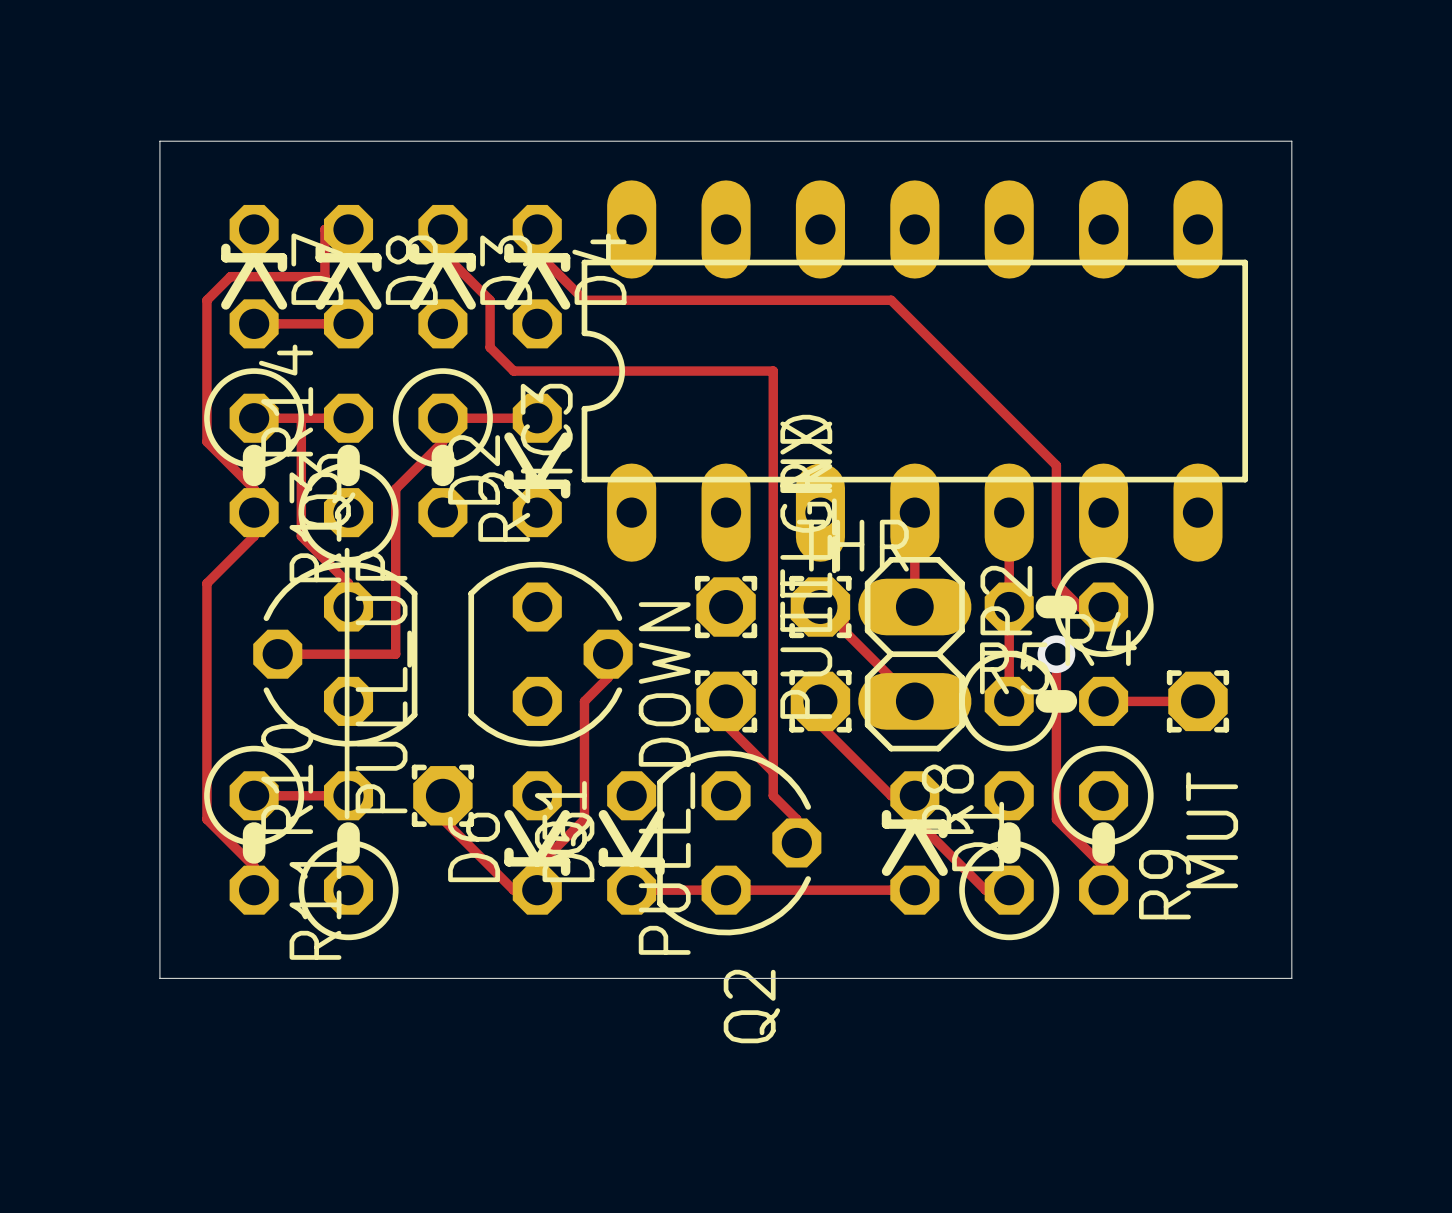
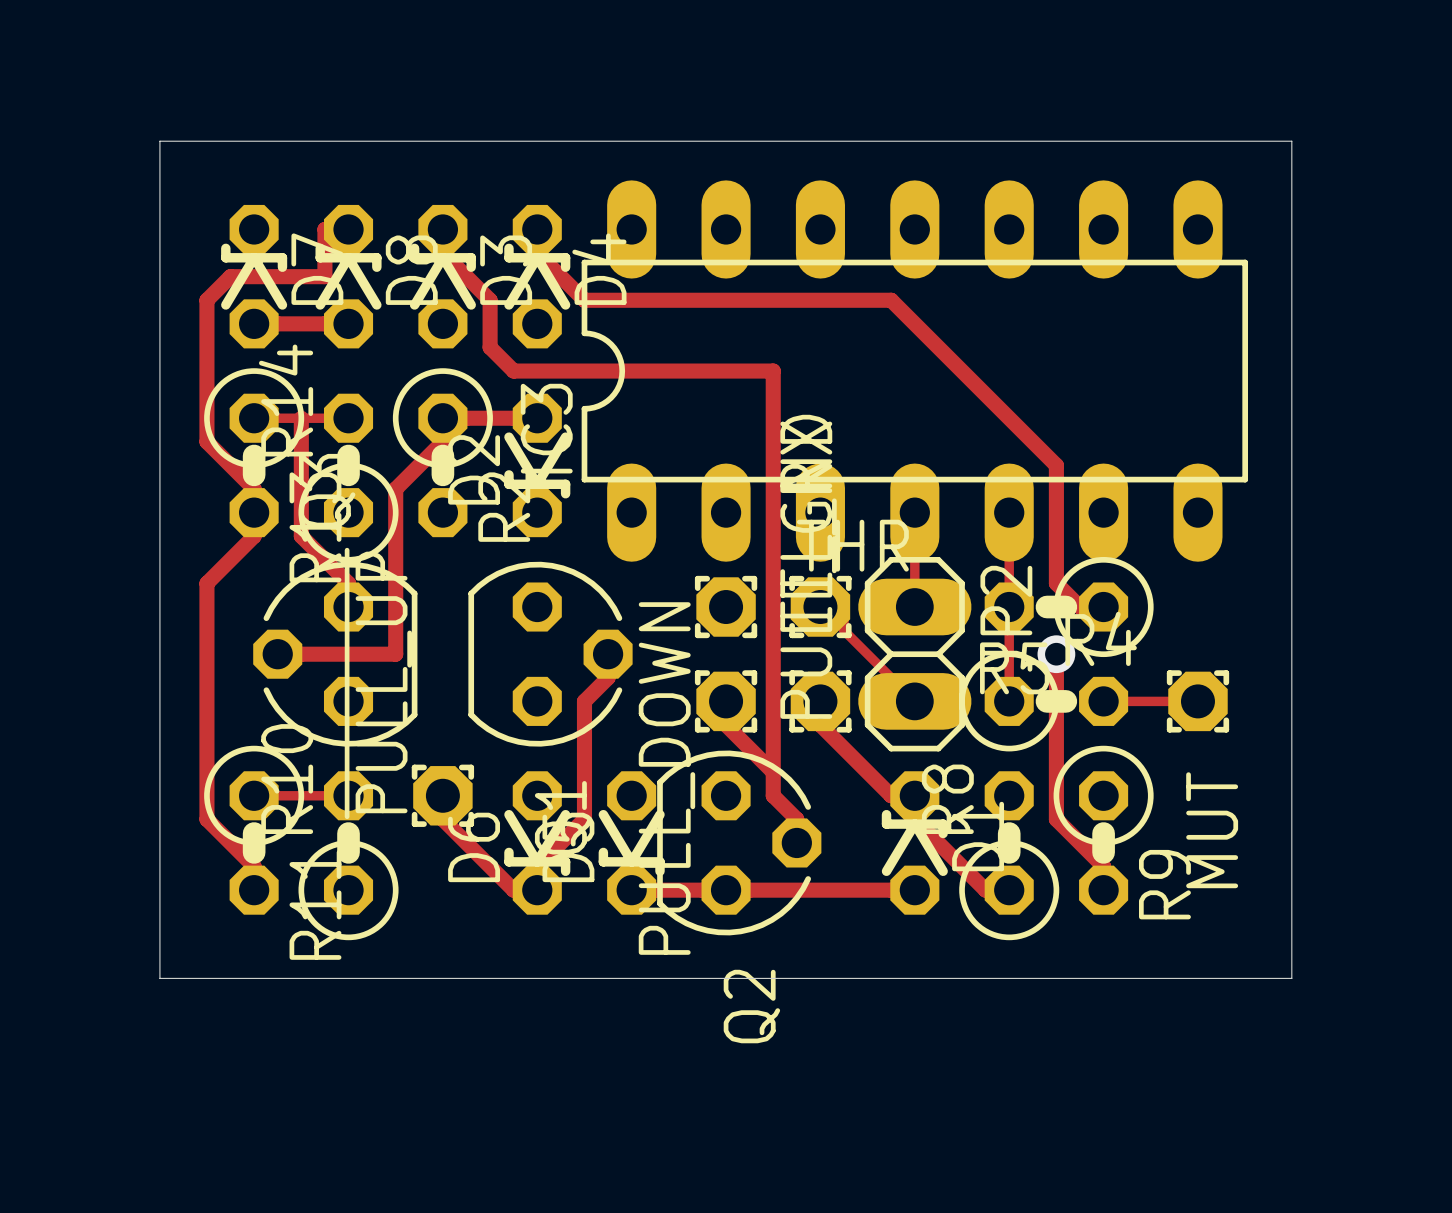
track width: thin (348, 229) (324, 229) (324, 276) (230, 276) (206, 300) (206, 441) (254, 489) (254, 536) (206, 583) (206, 819) (254, 866) (254, 890) -> thick (348, 229) (324, 229) (324, 276) (230, 276) (206, 300) (206, 441) (254, 489) (254, 536) (206, 583) (206, 819) (254, 866) (254, 890)
track width: thin (442, 229) (442, 253) (490, 300) (490, 347) (513, 371) (773, 371) (773, 795) (796, 819) (796, 842) -> thick (442, 229) (442, 253) (490, 300) (490, 347) (513, 371) (773, 371) (773, 795) (796, 819) (796, 842)
track width: thin (537, 229) (537, 253) (584, 300) (891, 300) (1056, 465) (1056, 583) (1080, 607) (1103, 607) -> thick (537, 229) (537, 253) (584, 300) (891, 300) (1056, 465) (1056, 583) (1080, 607) (1103, 607)
track width: thin (254, 323) (348, 323) -> thick (254, 323) (348, 323)
track width: thin (301, 418) (301, 536) (348, 583) (348, 607) -> thick (301, 418) (301, 536) (348, 583) (348, 607)
track width: thin (537, 418) (442, 418) (442, 441) (395, 489) (395, 654) (277, 654) -> thick (537, 418) (442, 418) (442, 441) (395, 489) (395, 654) (277, 654)
track width: thin (608, 654) (608, 677) (584, 701) (584, 819) (537, 866) (537, 890) (513, 890) (442, 819) (442, 795) -> thick (608, 654) (608, 677) (584, 701) (584, 819) (537, 866) (537, 890) (513, 890) (442, 819) (442, 795)
track width: thin (1056, 654) (1056, 819) (1103, 866) (1103, 890) -> thick (1056, 654) (1056, 819) (1103, 866) (1103, 890)
track width: thin (726, 701) (726, 724) (773, 772) -> thick (726, 701) (726, 724) (773, 772)
track width: thin (820, 701) (820, 724) (891, 795) (914, 795) (914, 819) (985, 890) (1009, 890) -> thick (820, 701) (820, 724) (891, 795) (914, 795) (914, 819) (985, 890) (1009, 890)
track width: thin (631, 890) (914, 890) -> thick (631, 890) (914, 890)

